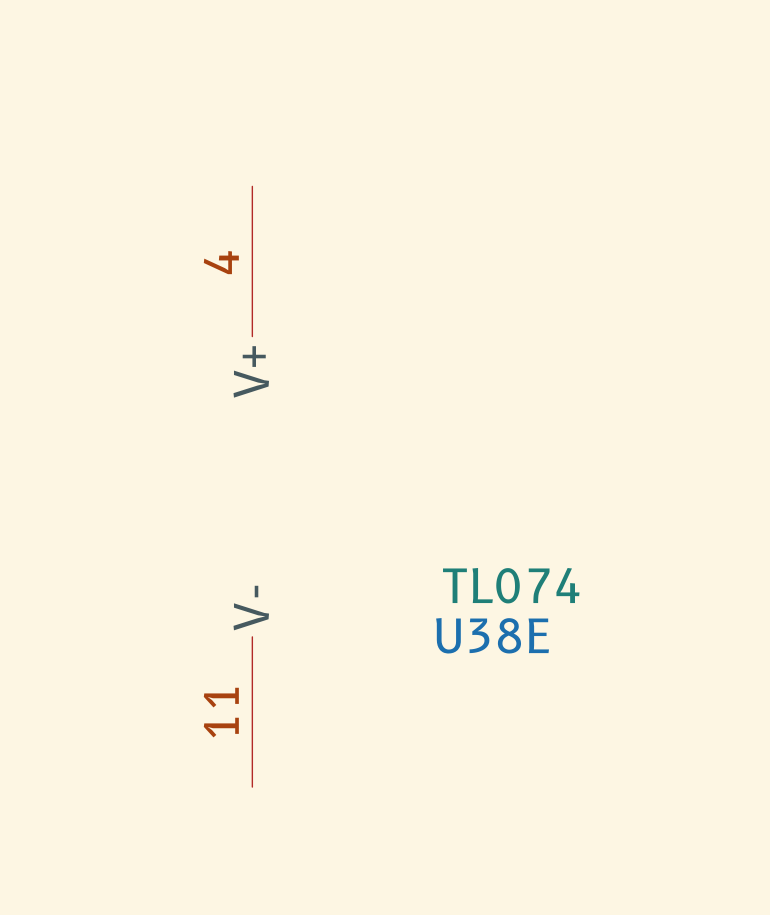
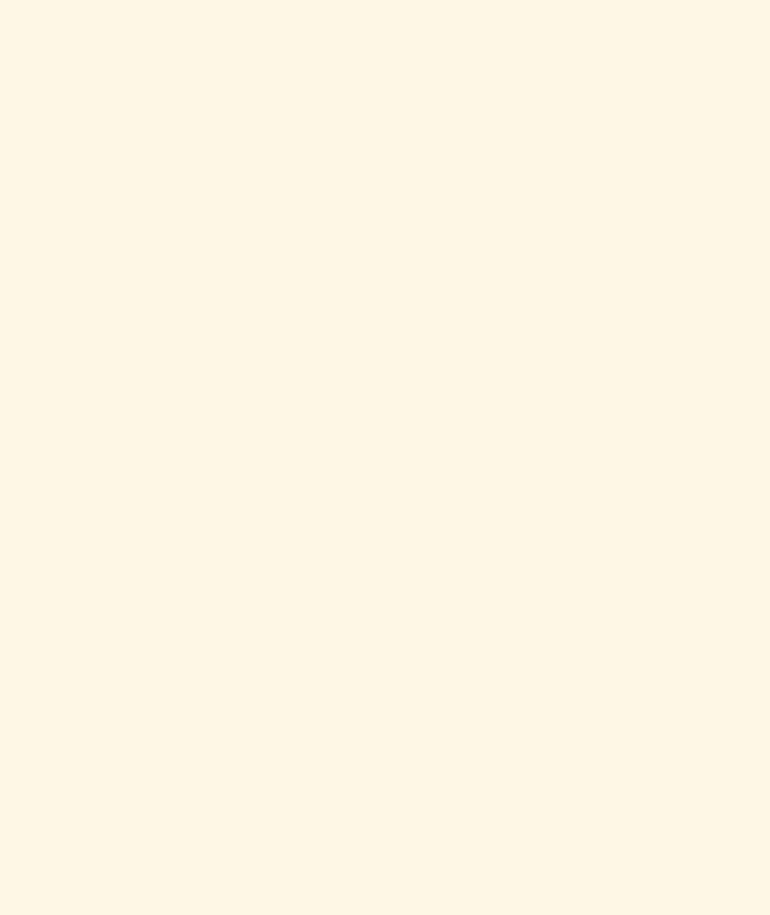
U38E: TL074 (252, 486) -> none

